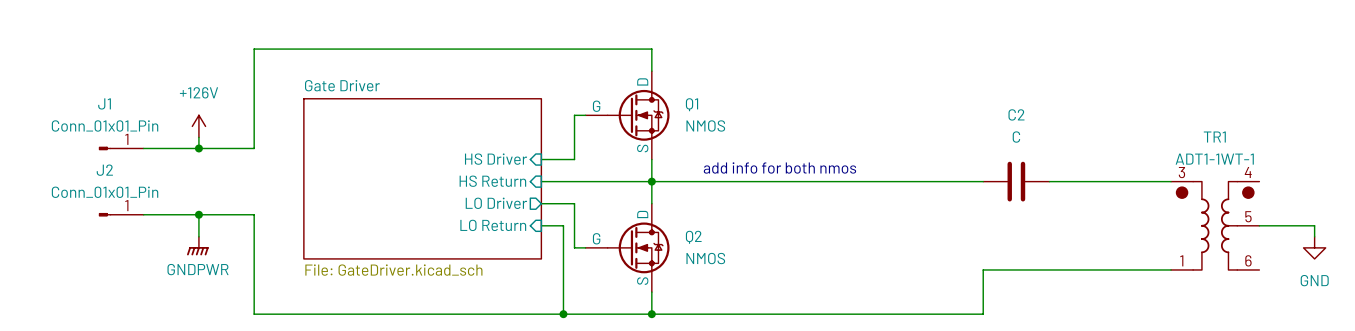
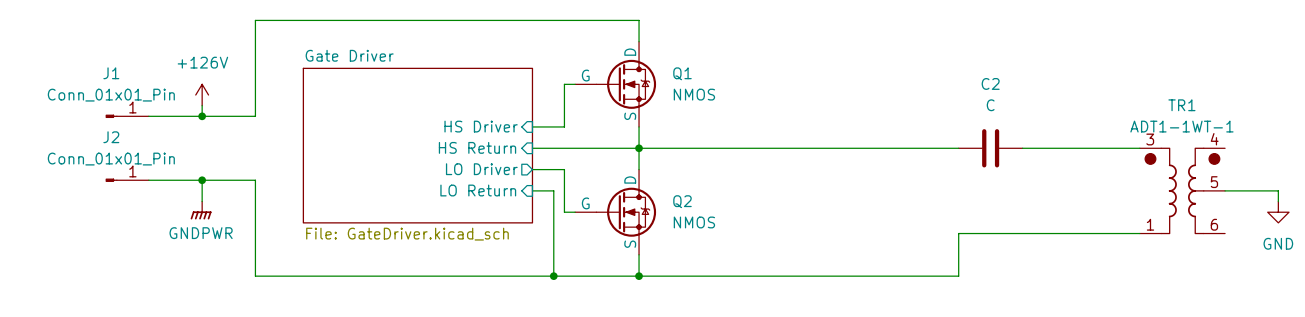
text: add info for both nmos (779, 167) -> none

